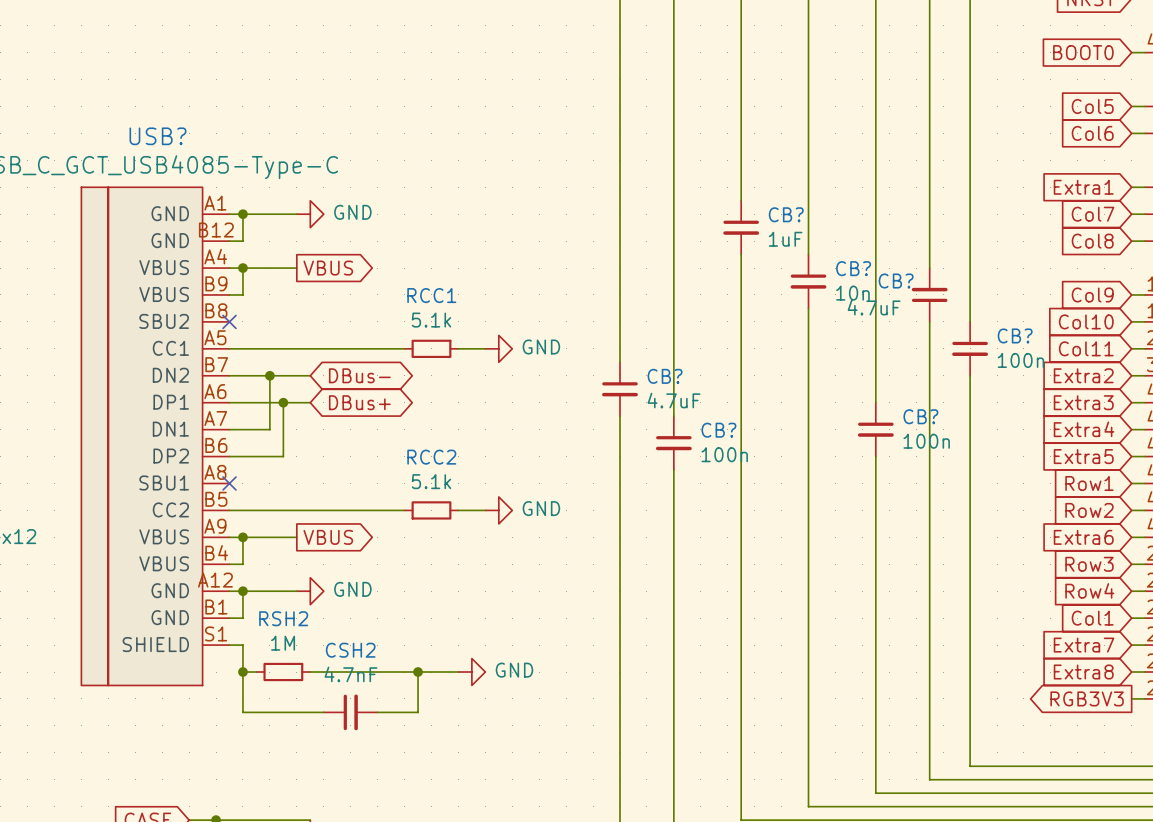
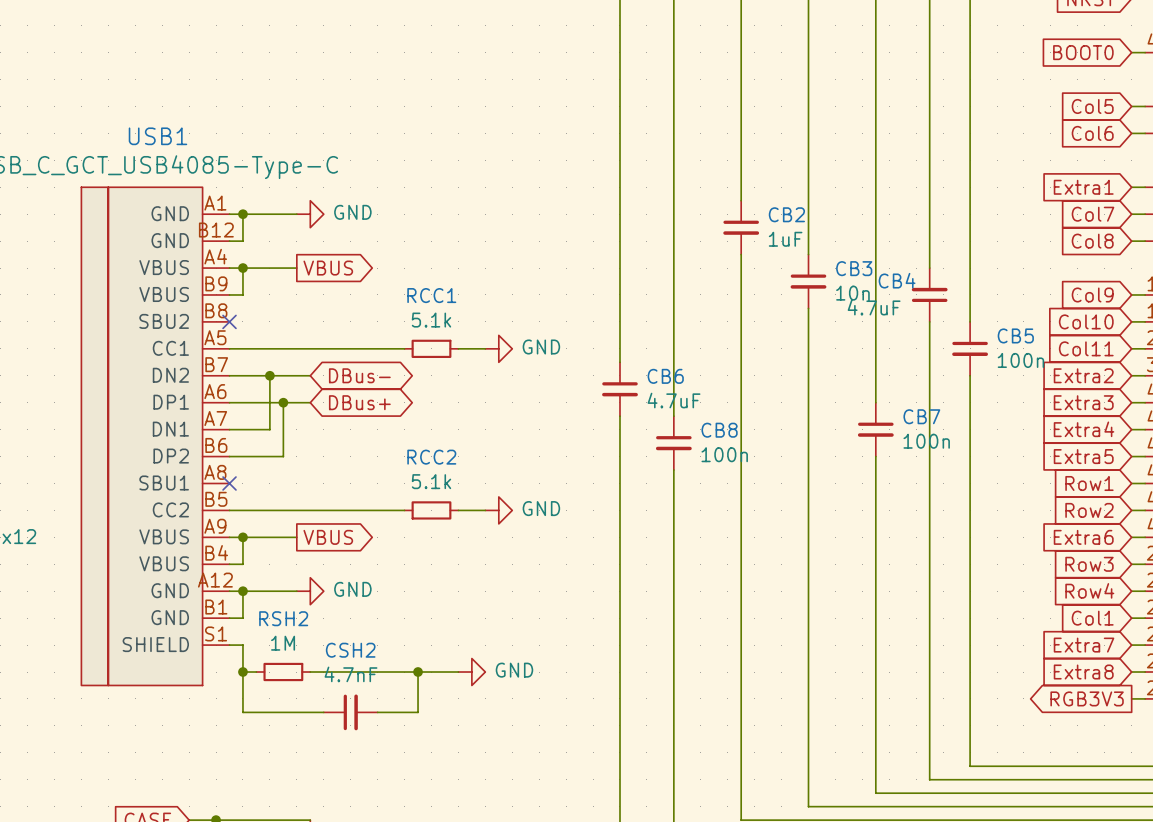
USB? name: USB? (158, 136) -> USB1 (158, 136)
CB? name: CB? (786, 214) -> CB2 (786, 214)
CB? name: CB? (853, 268) -> CB3 (854, 268)
CB? name: CB? (896, 281) -> CB4 (897, 280)
CB? name: CB? (1015, 335) -> CB5 (1015, 335)
CB? name: CB? (665, 376) -> CB6 (665, 376)
CB? name: CB? (920, 416) -> CB7 (921, 416)
CB? name: CB? (718, 430) -> CB8 (719, 430)

